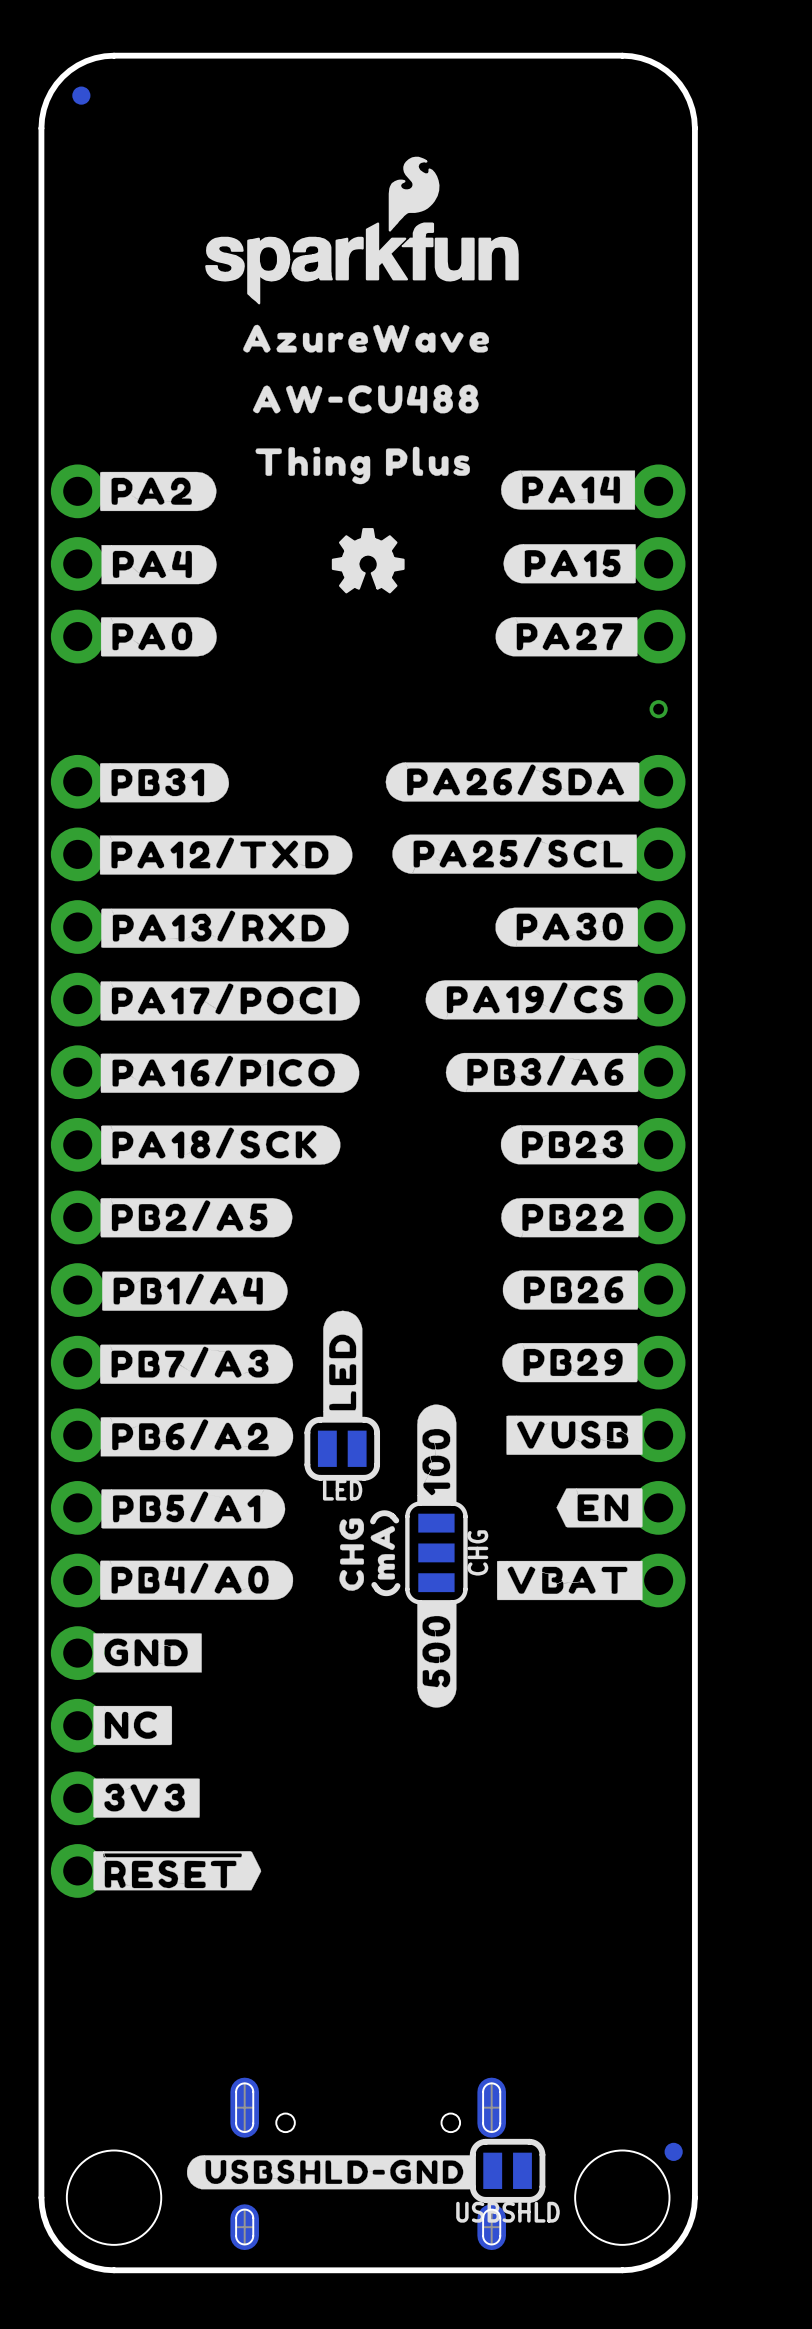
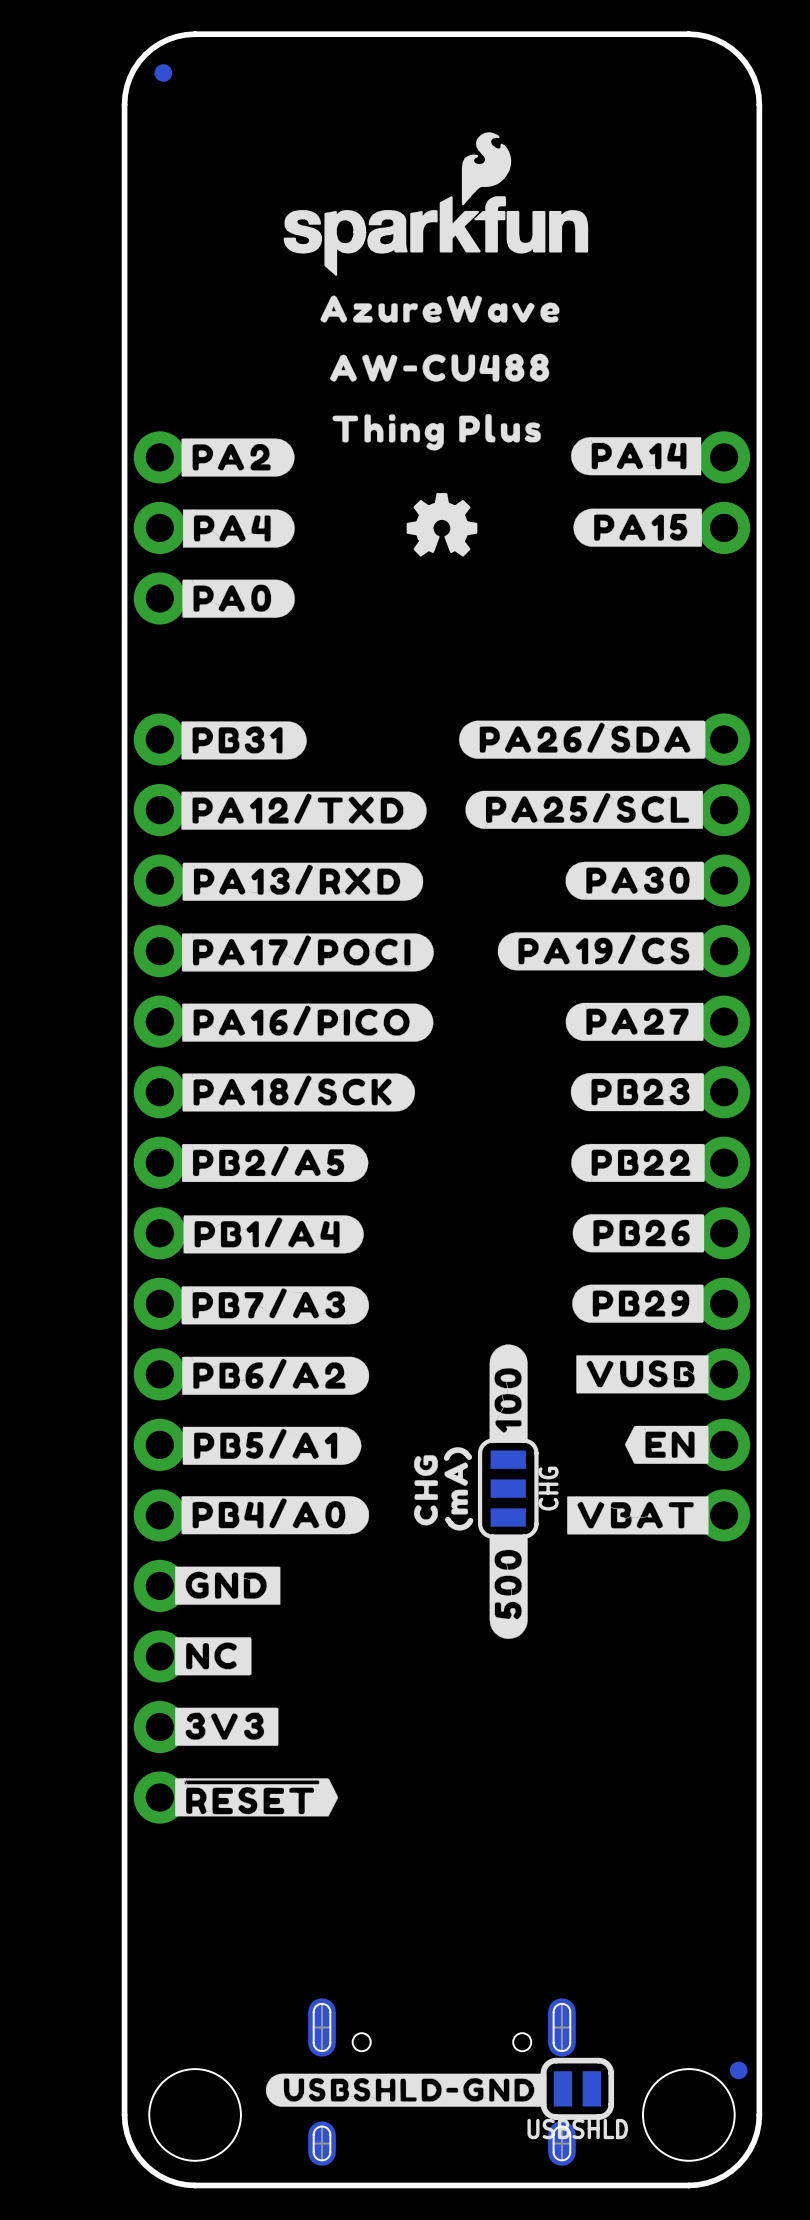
part: (658, 563) -> none
drawing position: (566, 636) -> (634, 1021)
part: (658, 709) -> none
drawing: [445, 1052, 639, 1093] -> none
drawing: [323, 1310, 363, 1422] -> none
LED: (342, 1448) -> none

